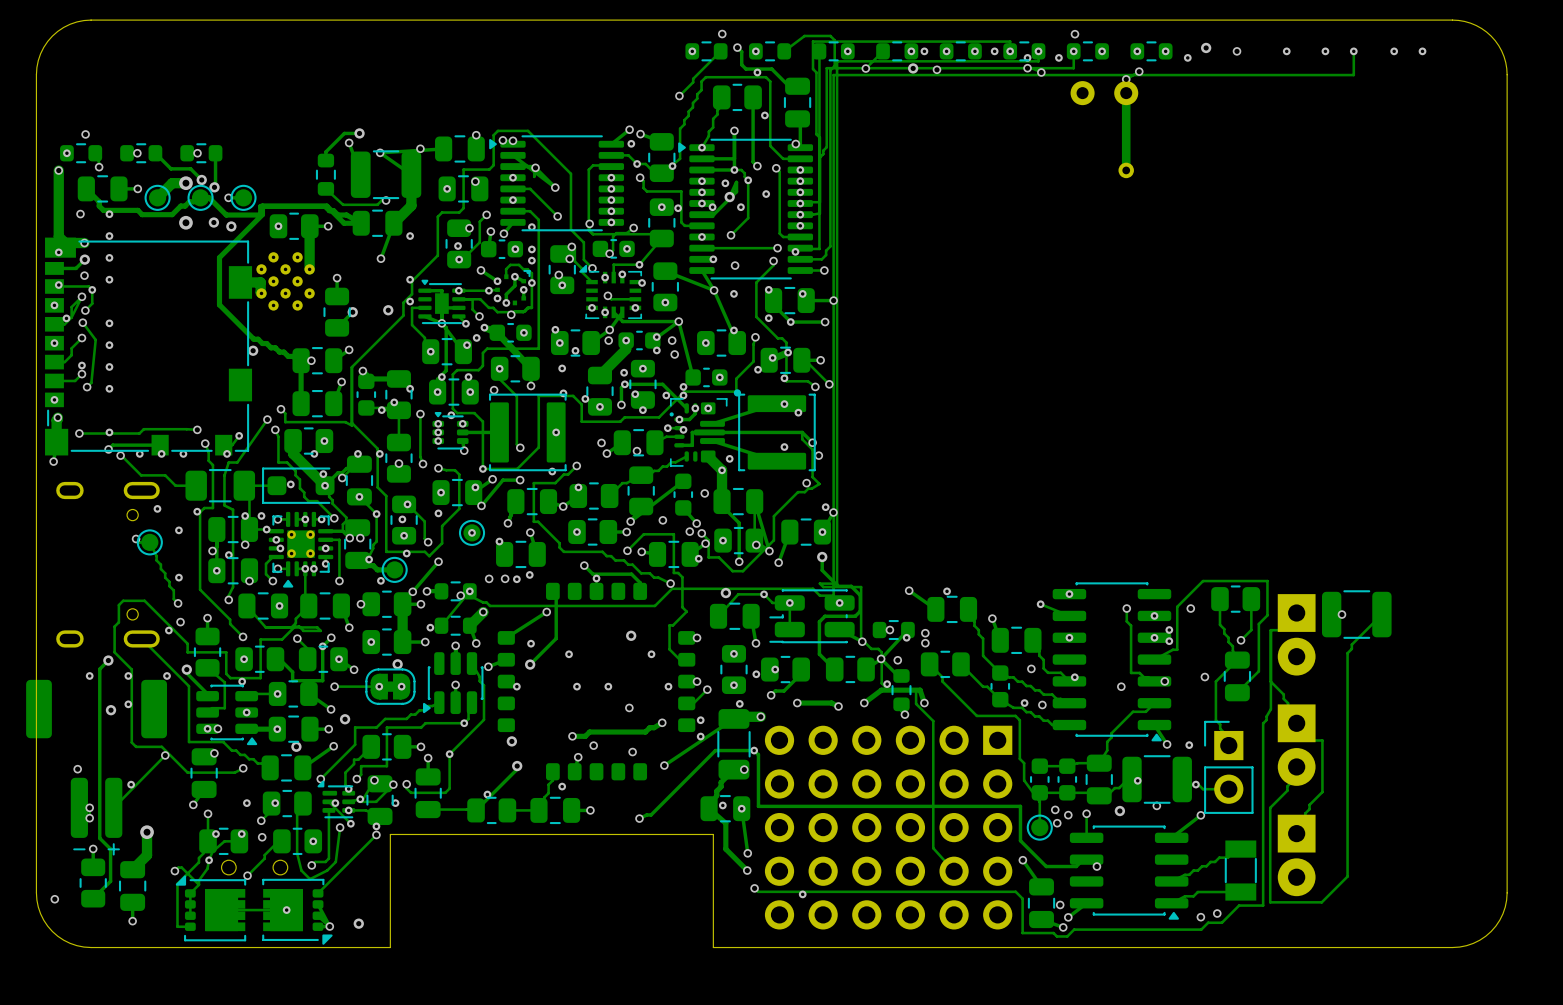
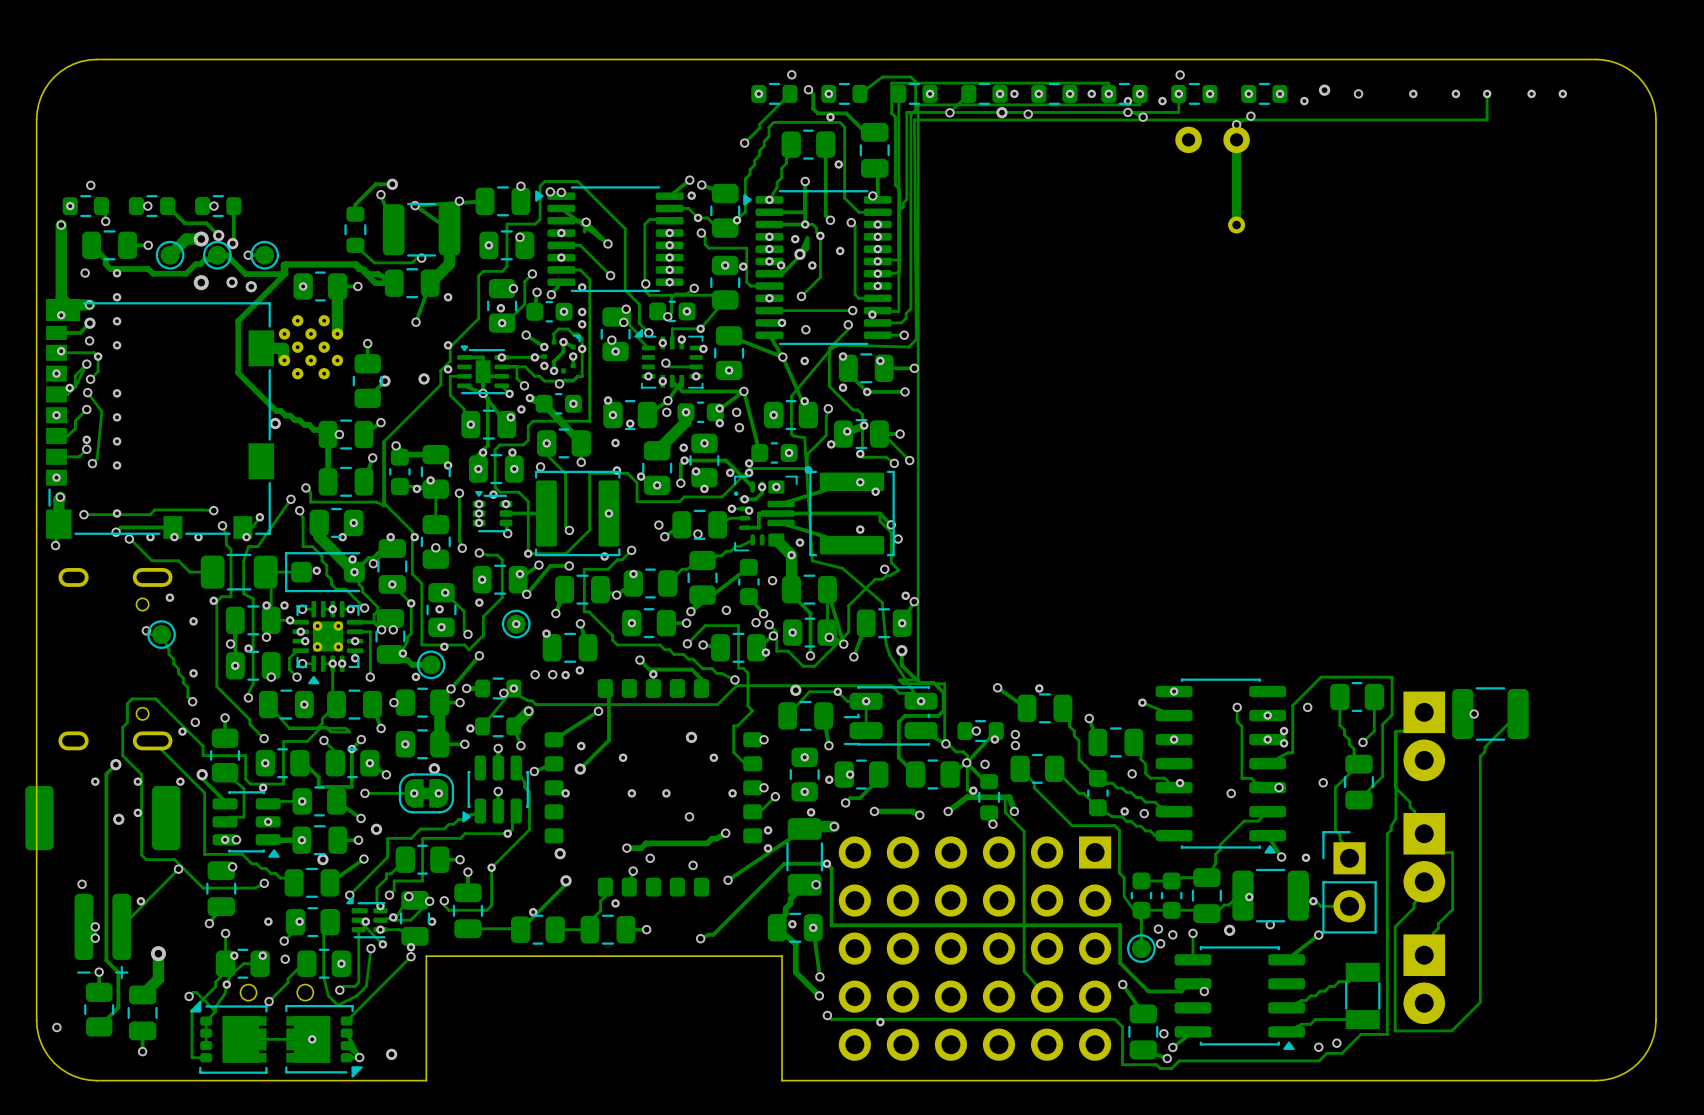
track: (833, 75) (833, 595) -> (914, 120) (916, 339) (908, 347) (838, 345) (831, 348) (791, 396) (791, 434) (804, 437) (812, 560) (842, 568) (882, 602) (886, 644) (889, 655) (914, 693)

